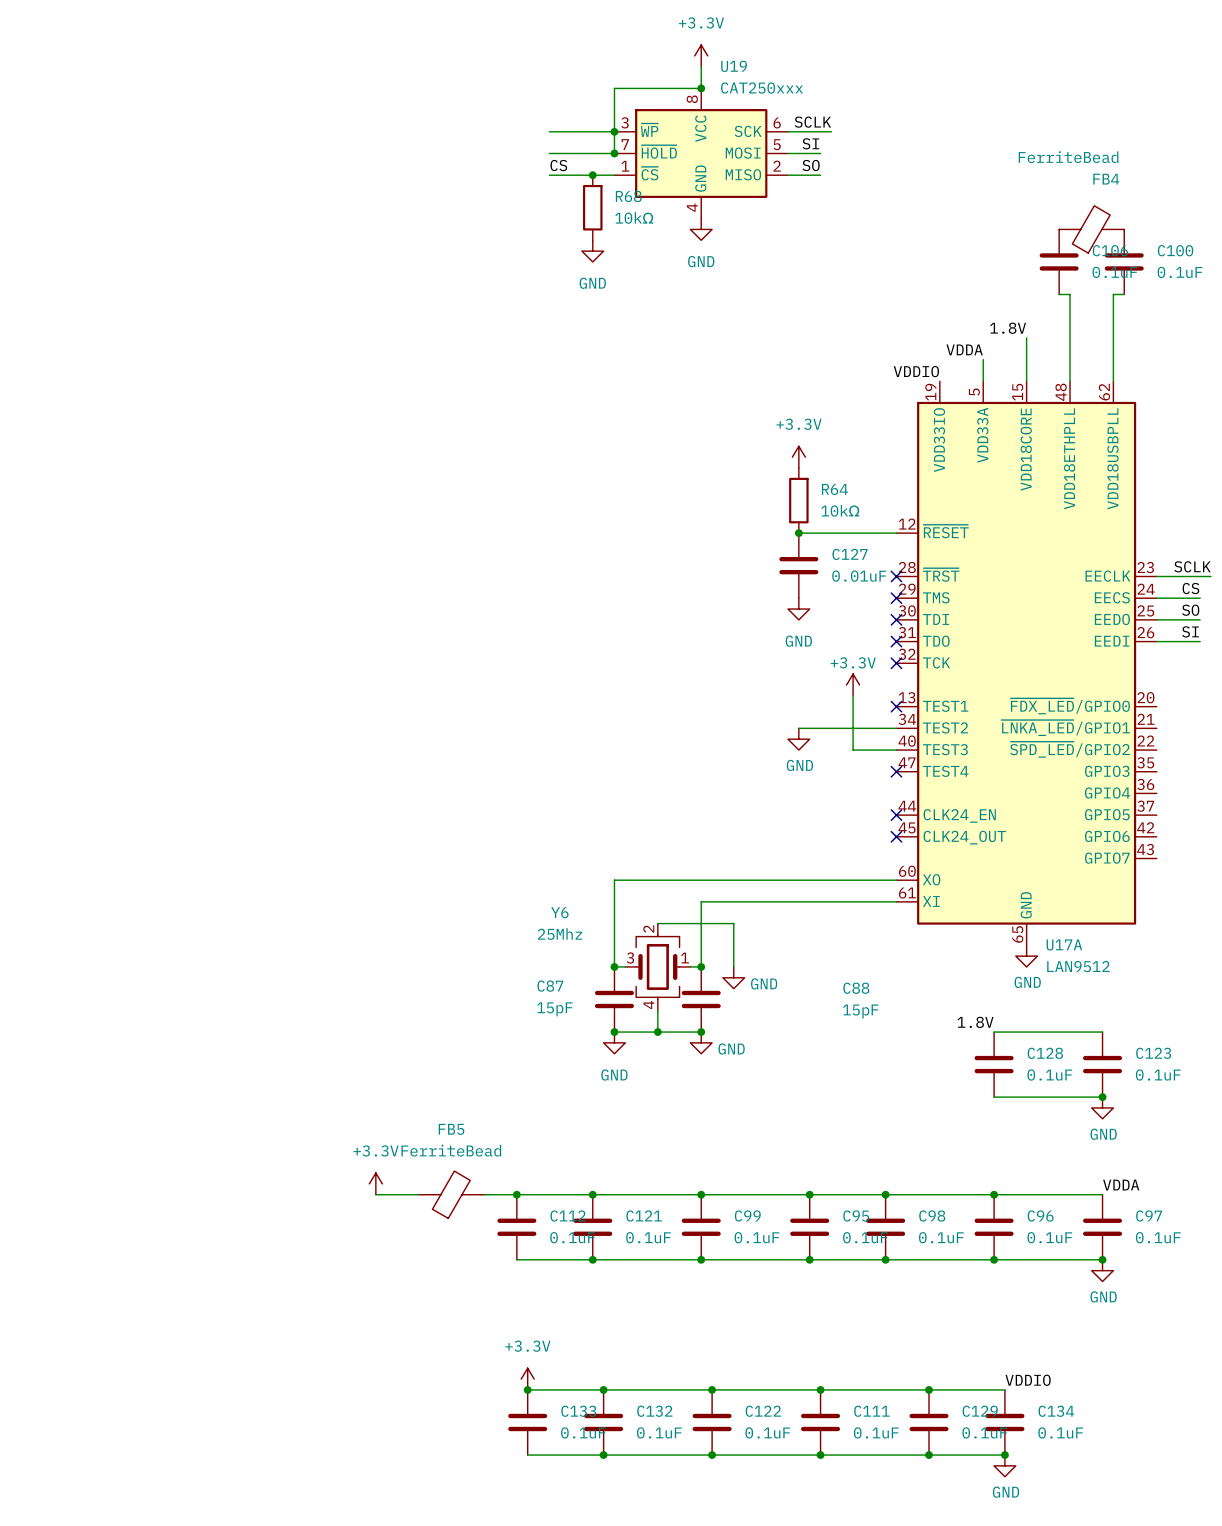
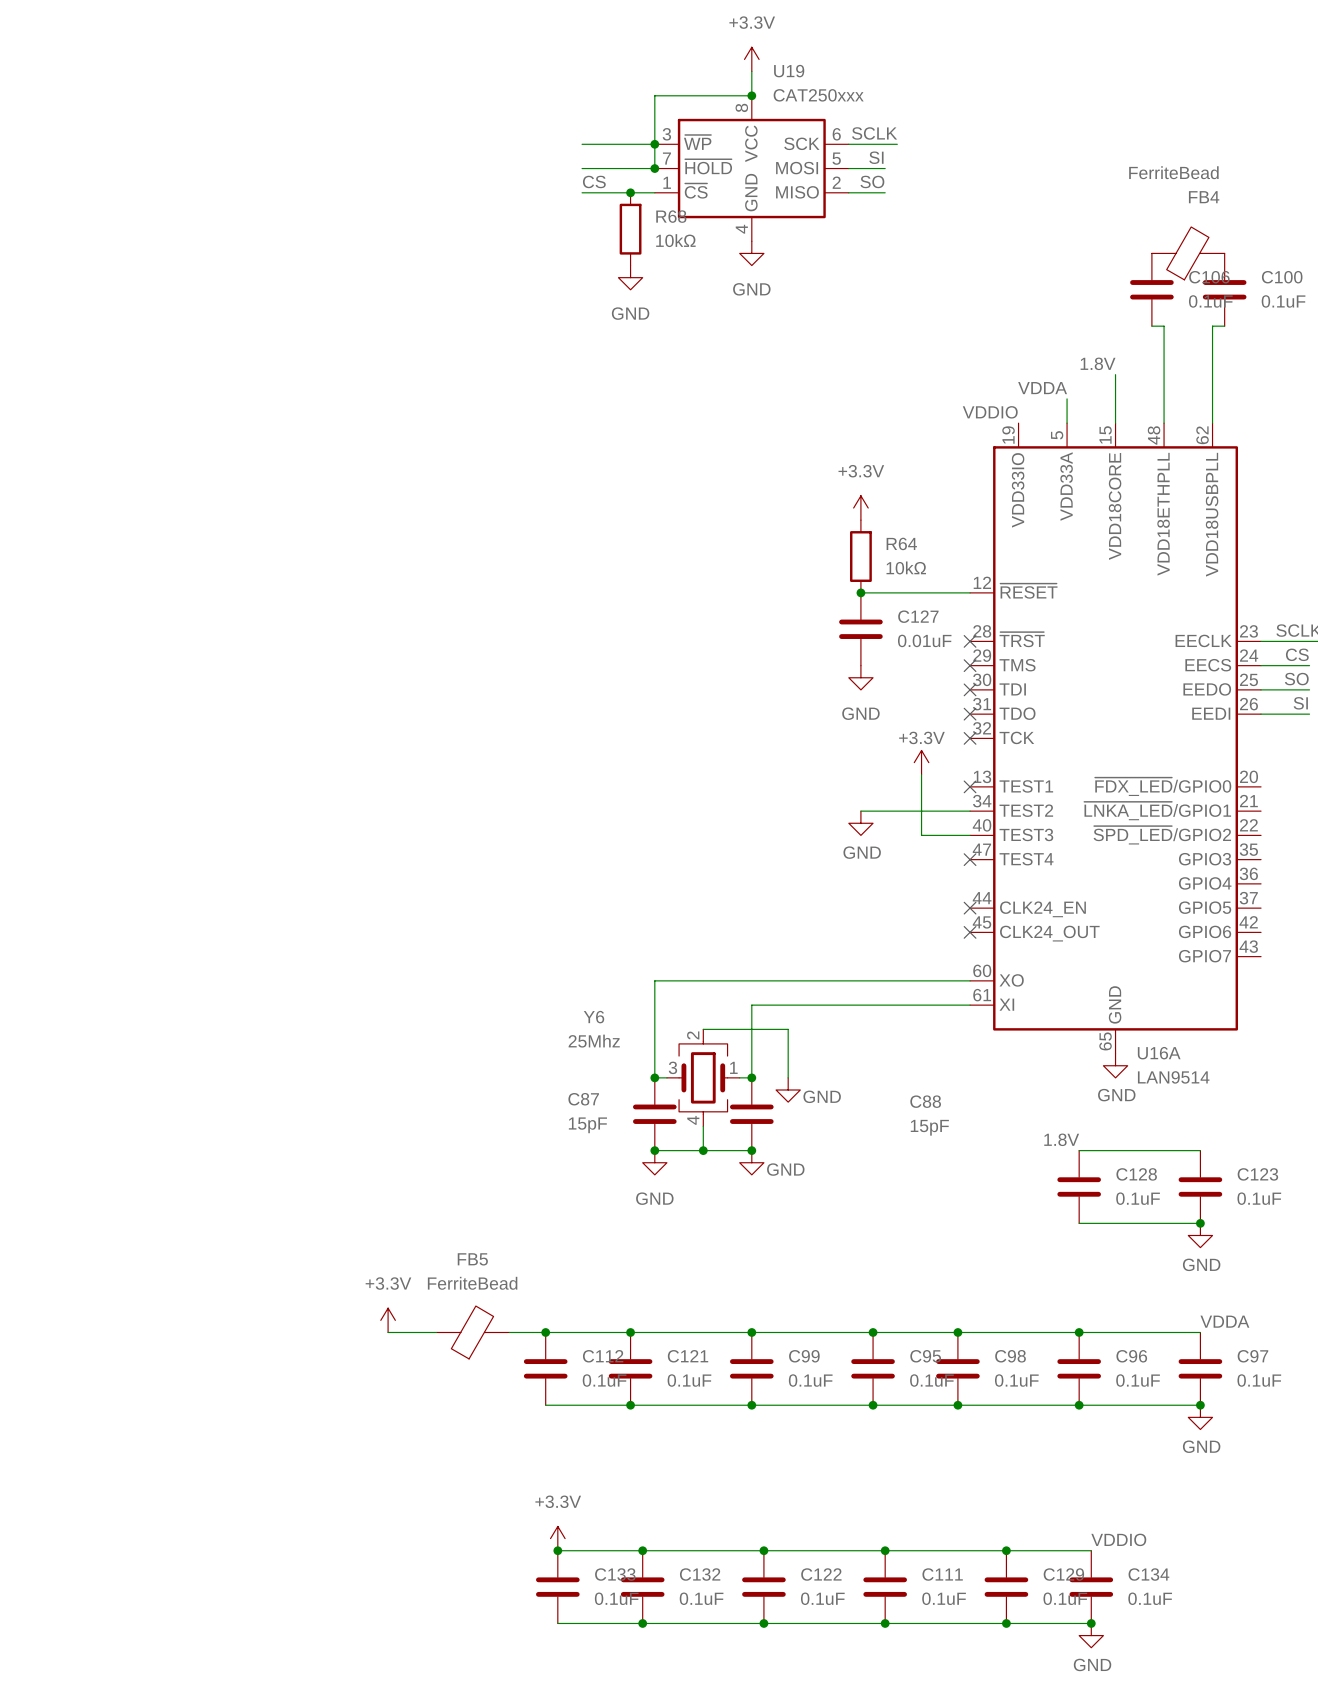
U17A name: U17A (1064, 944) -> U16A (1159, 1053)
U17A value: LAN9512 (1078, 966) -> LAN9514 (1173, 1077)

